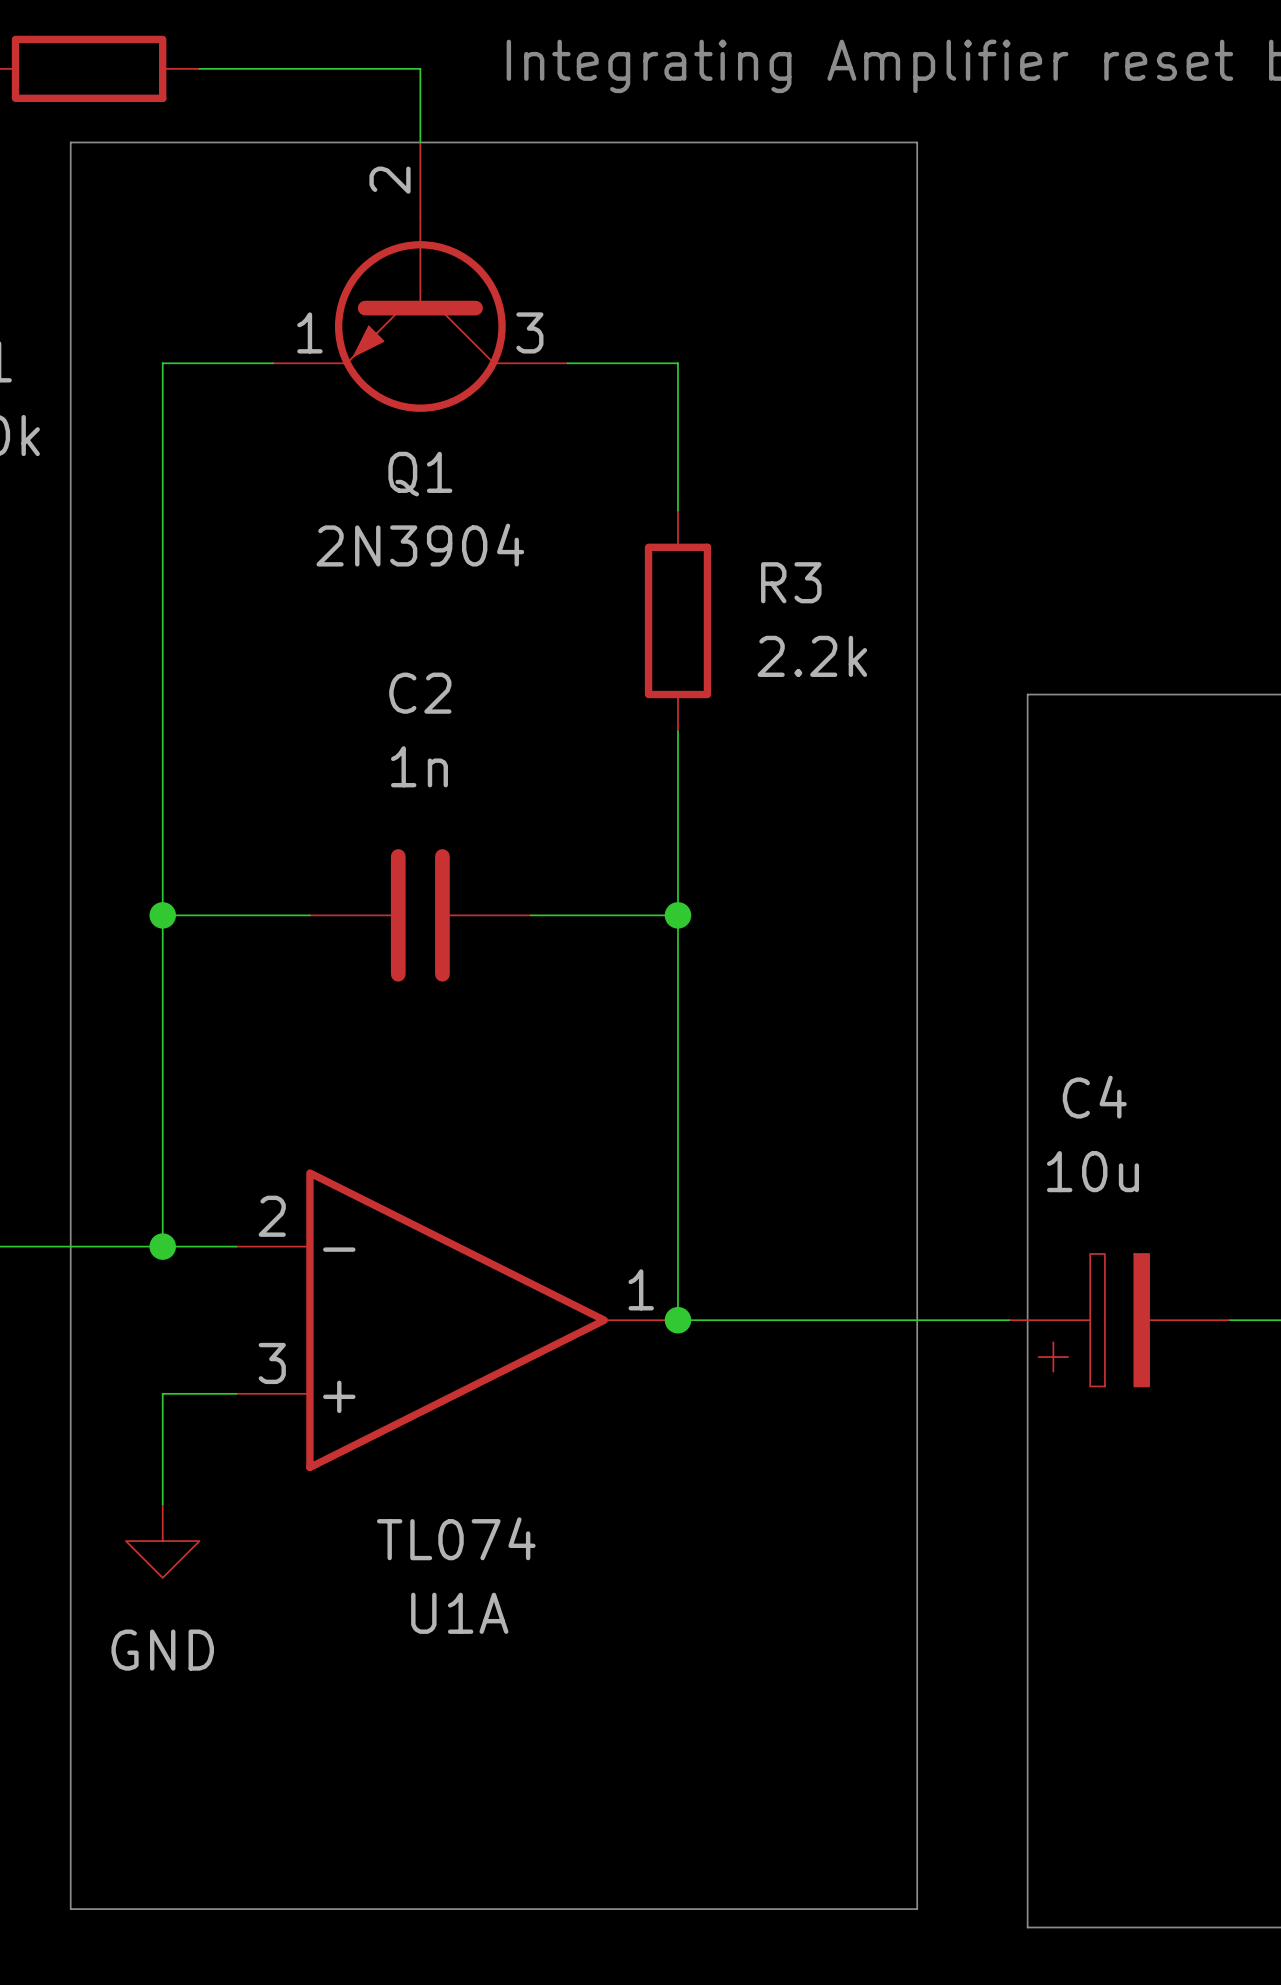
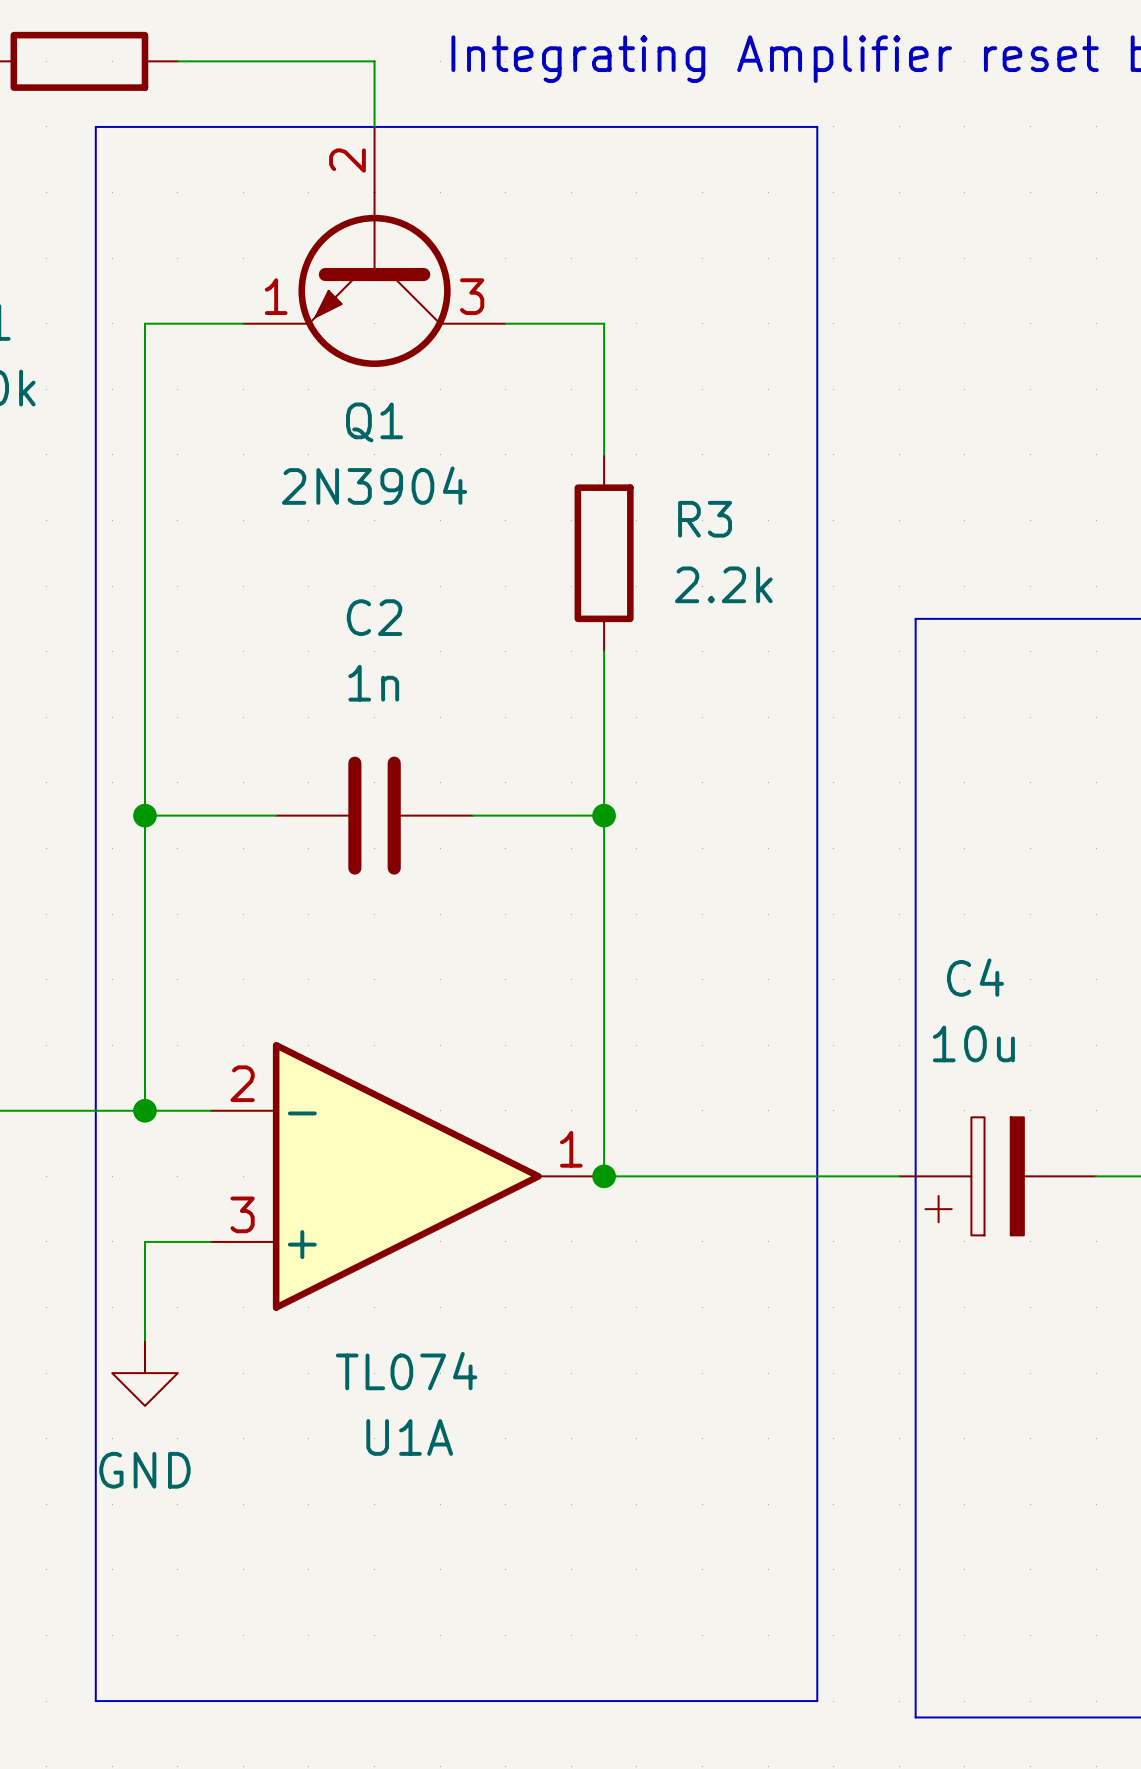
line: (107, 142) (70, 142) (70, 1909) (107, 1909) -> (95, 126) (95, 1701)

